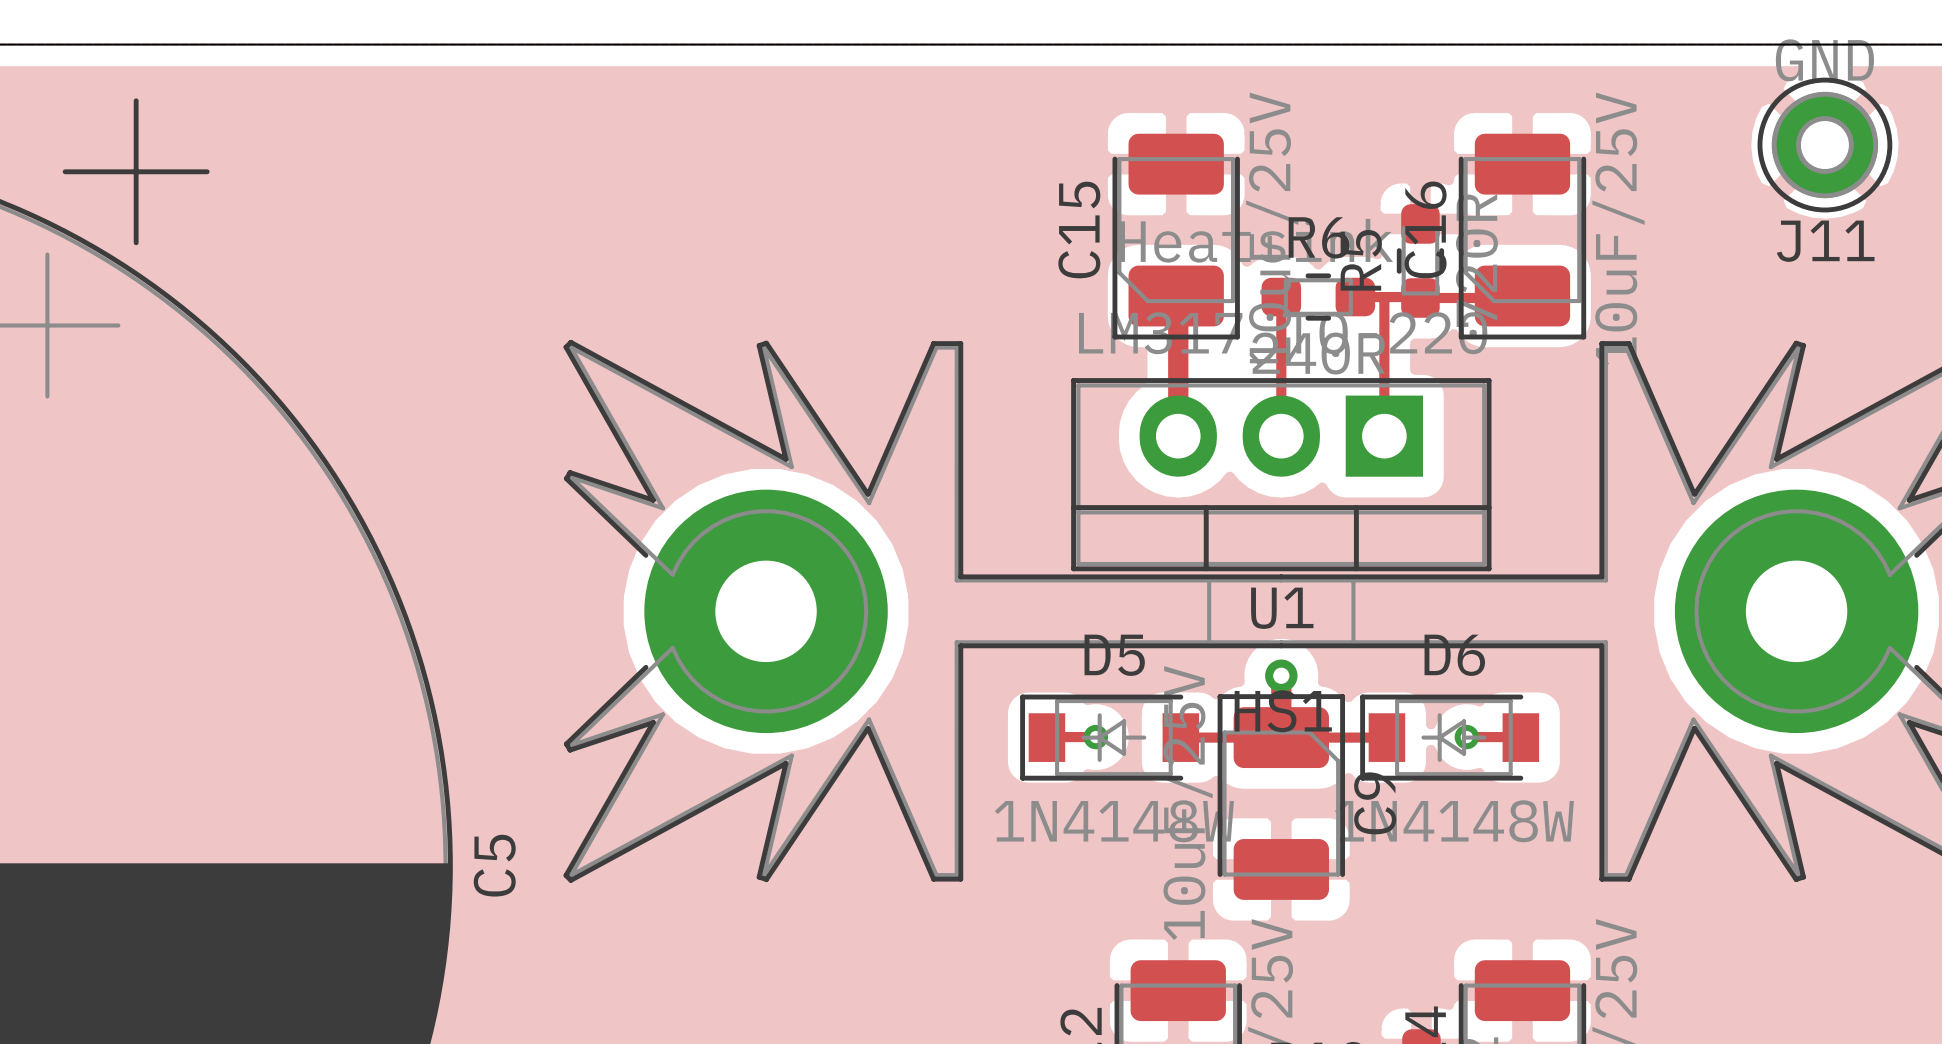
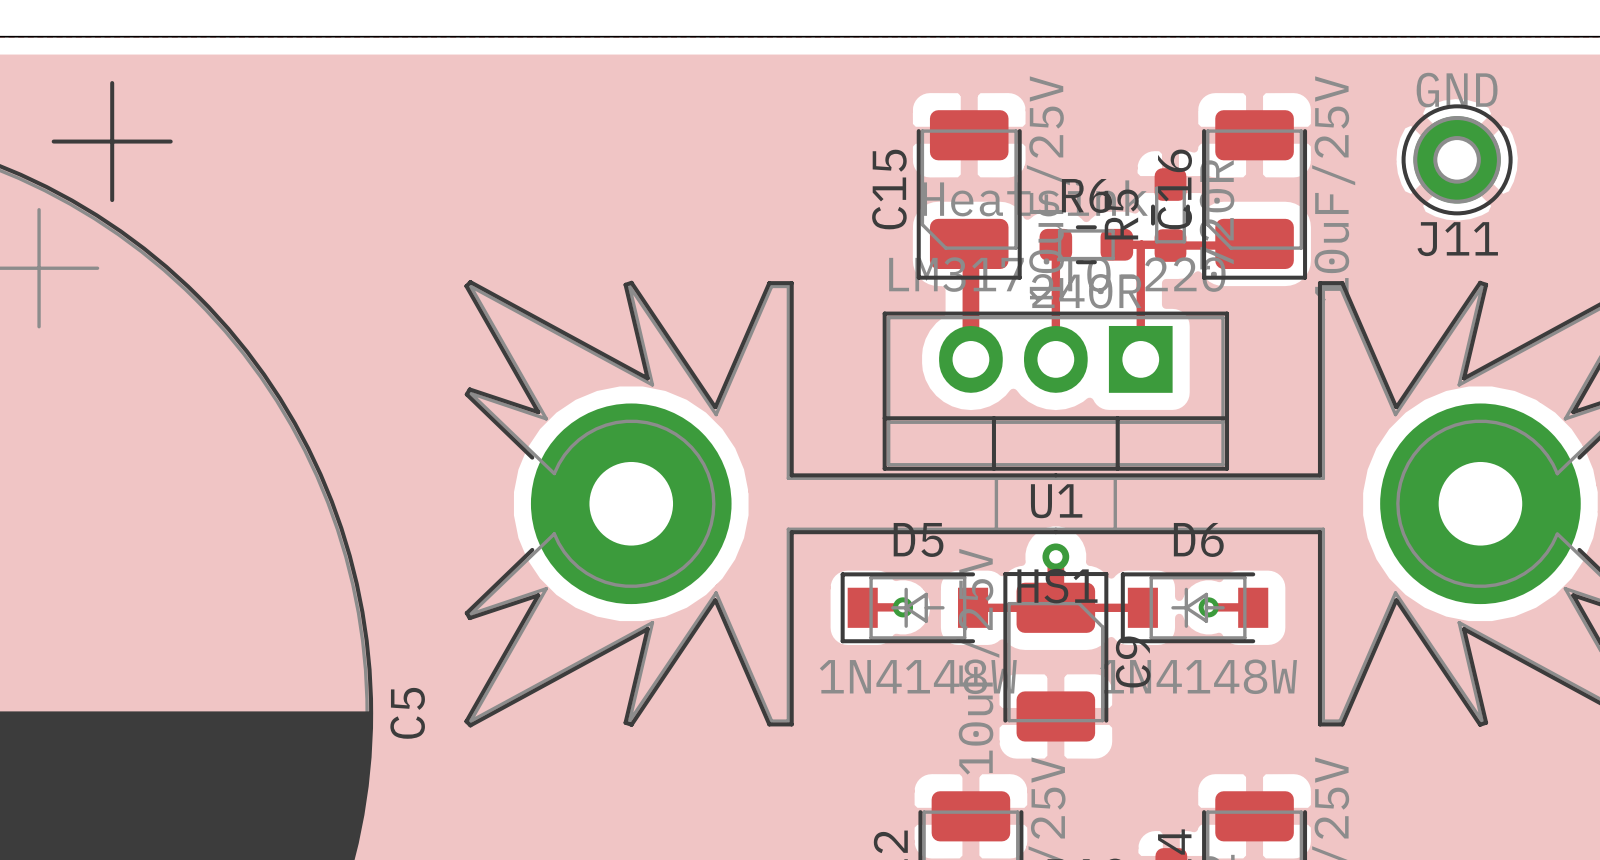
J11 position: (1824, 145) -> (1457, 159)

